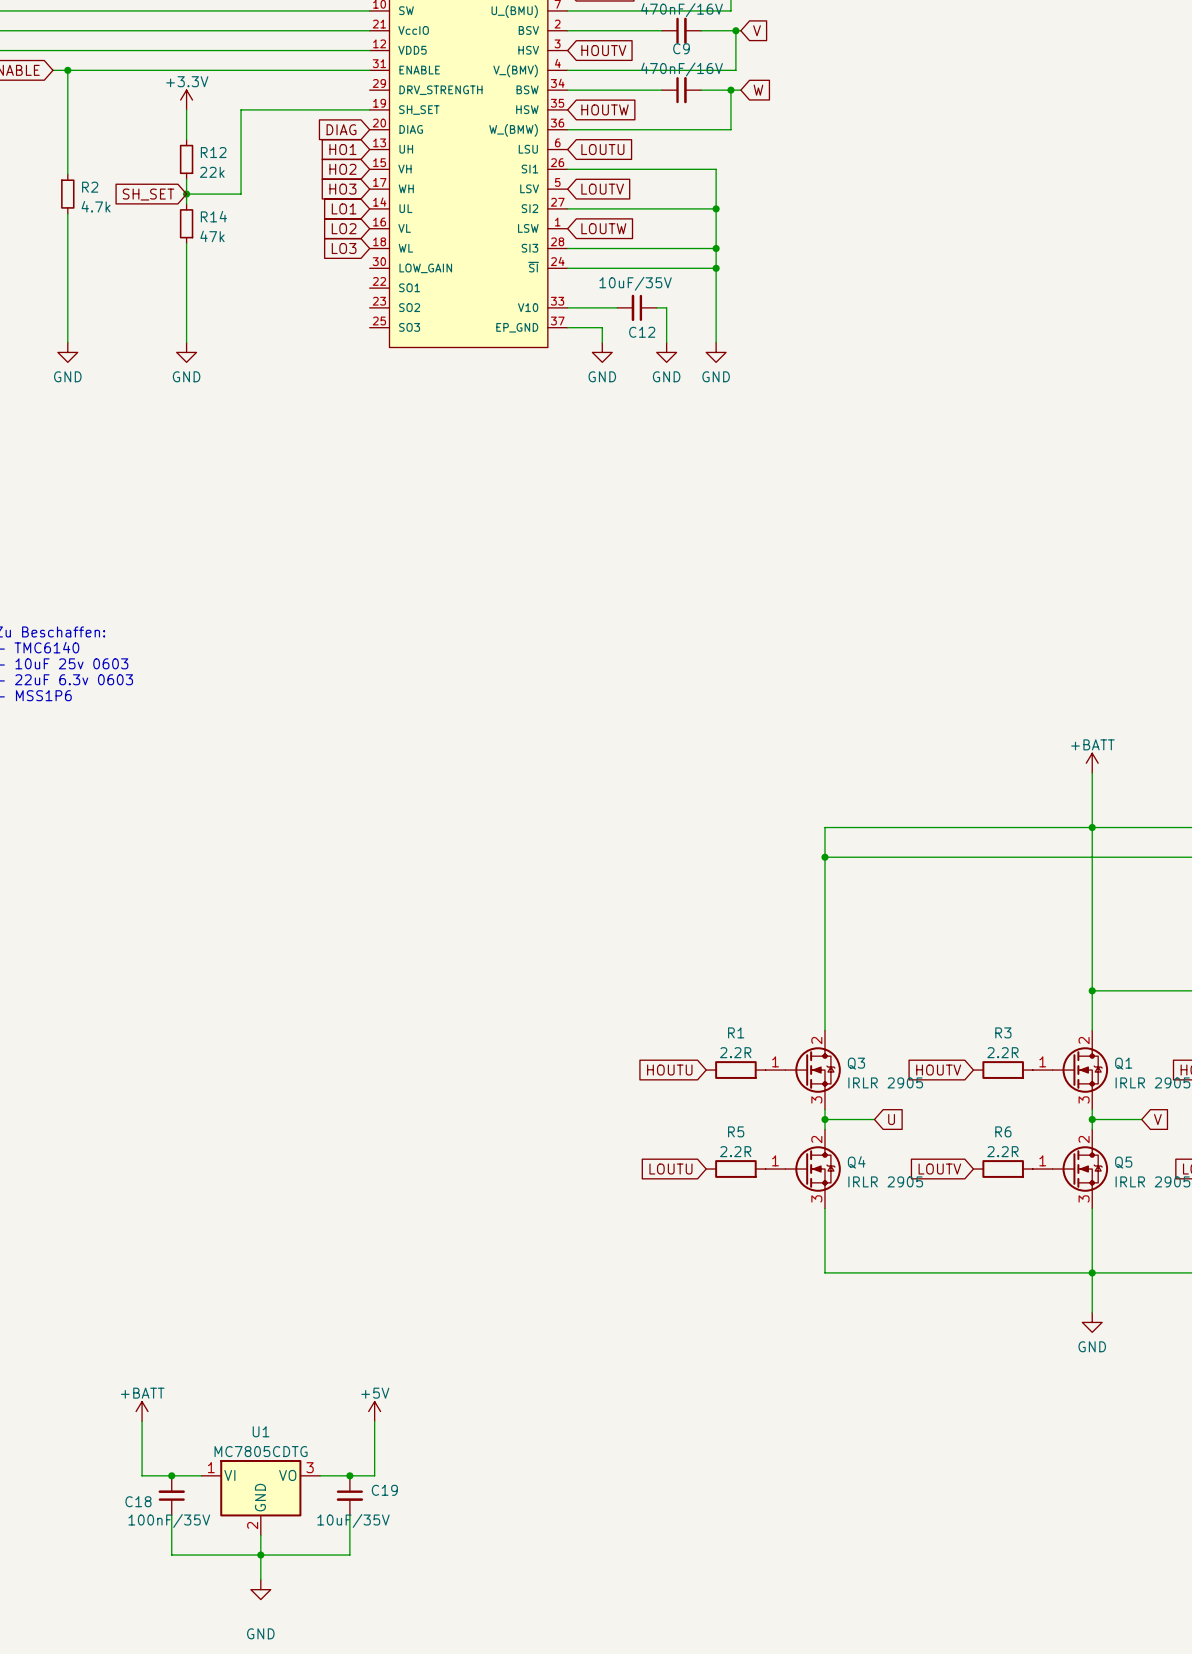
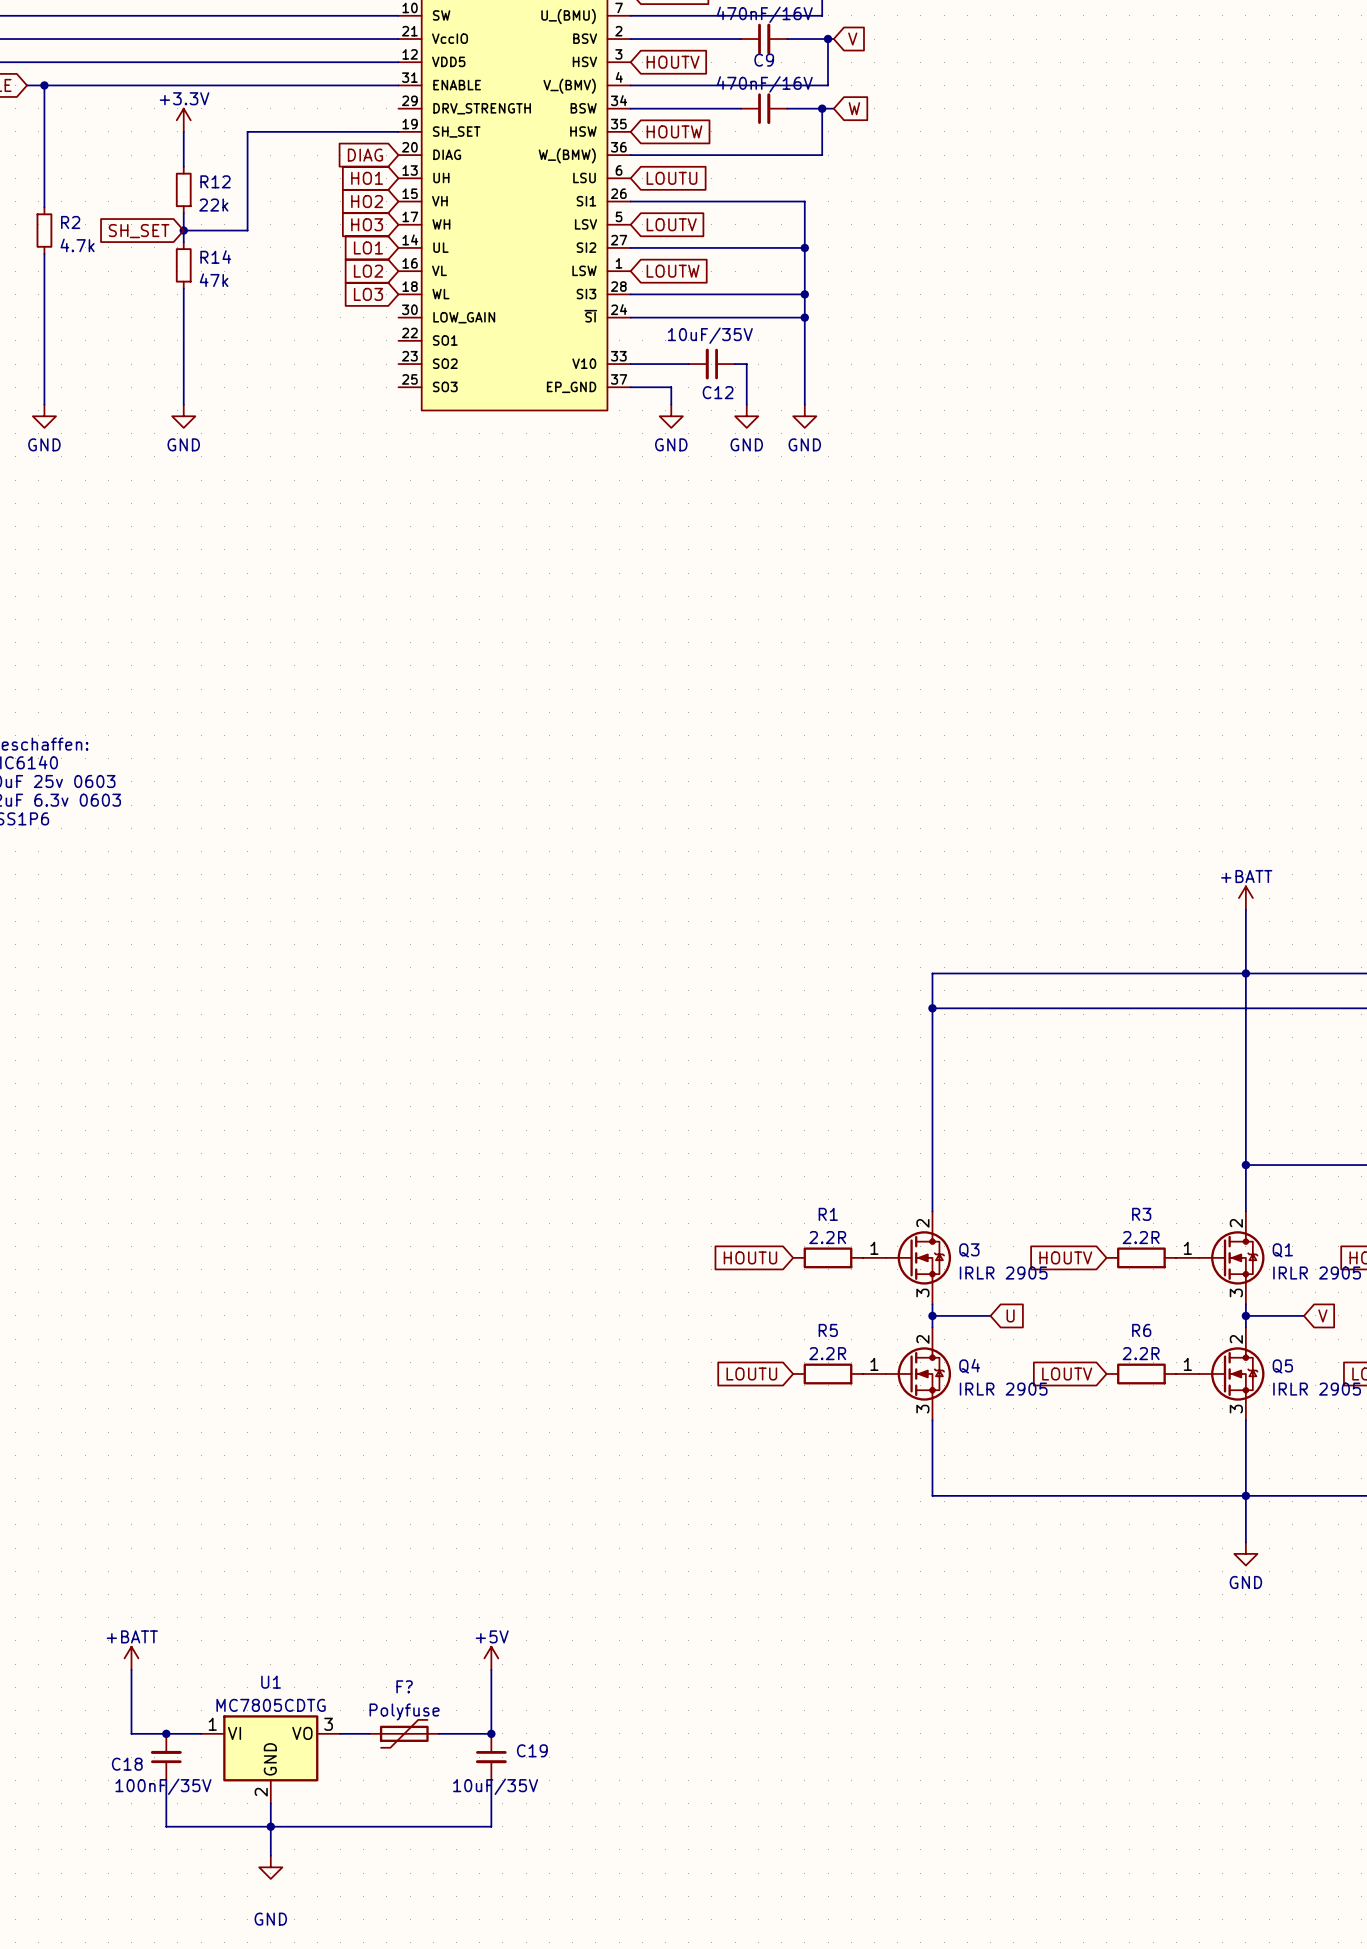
power symbol position: +5V (374, 1411) -> +5V (491, 1658)
wire: (374, 1421) (374, 1475) (344, 1475) -> none
wire: none -> (491, 1670) (491, 1733) (439, 1733)
junction: (349, 1475) -> none
F?: none -> Polyfuse (404, 1733)
junction: none -> (491, 1733)
C19 position: (349, 1495) -> (491, 1757)
wire: (349, 1515) (349, 1555) -> (491, 1780) (491, 1826) (375, 1826)

